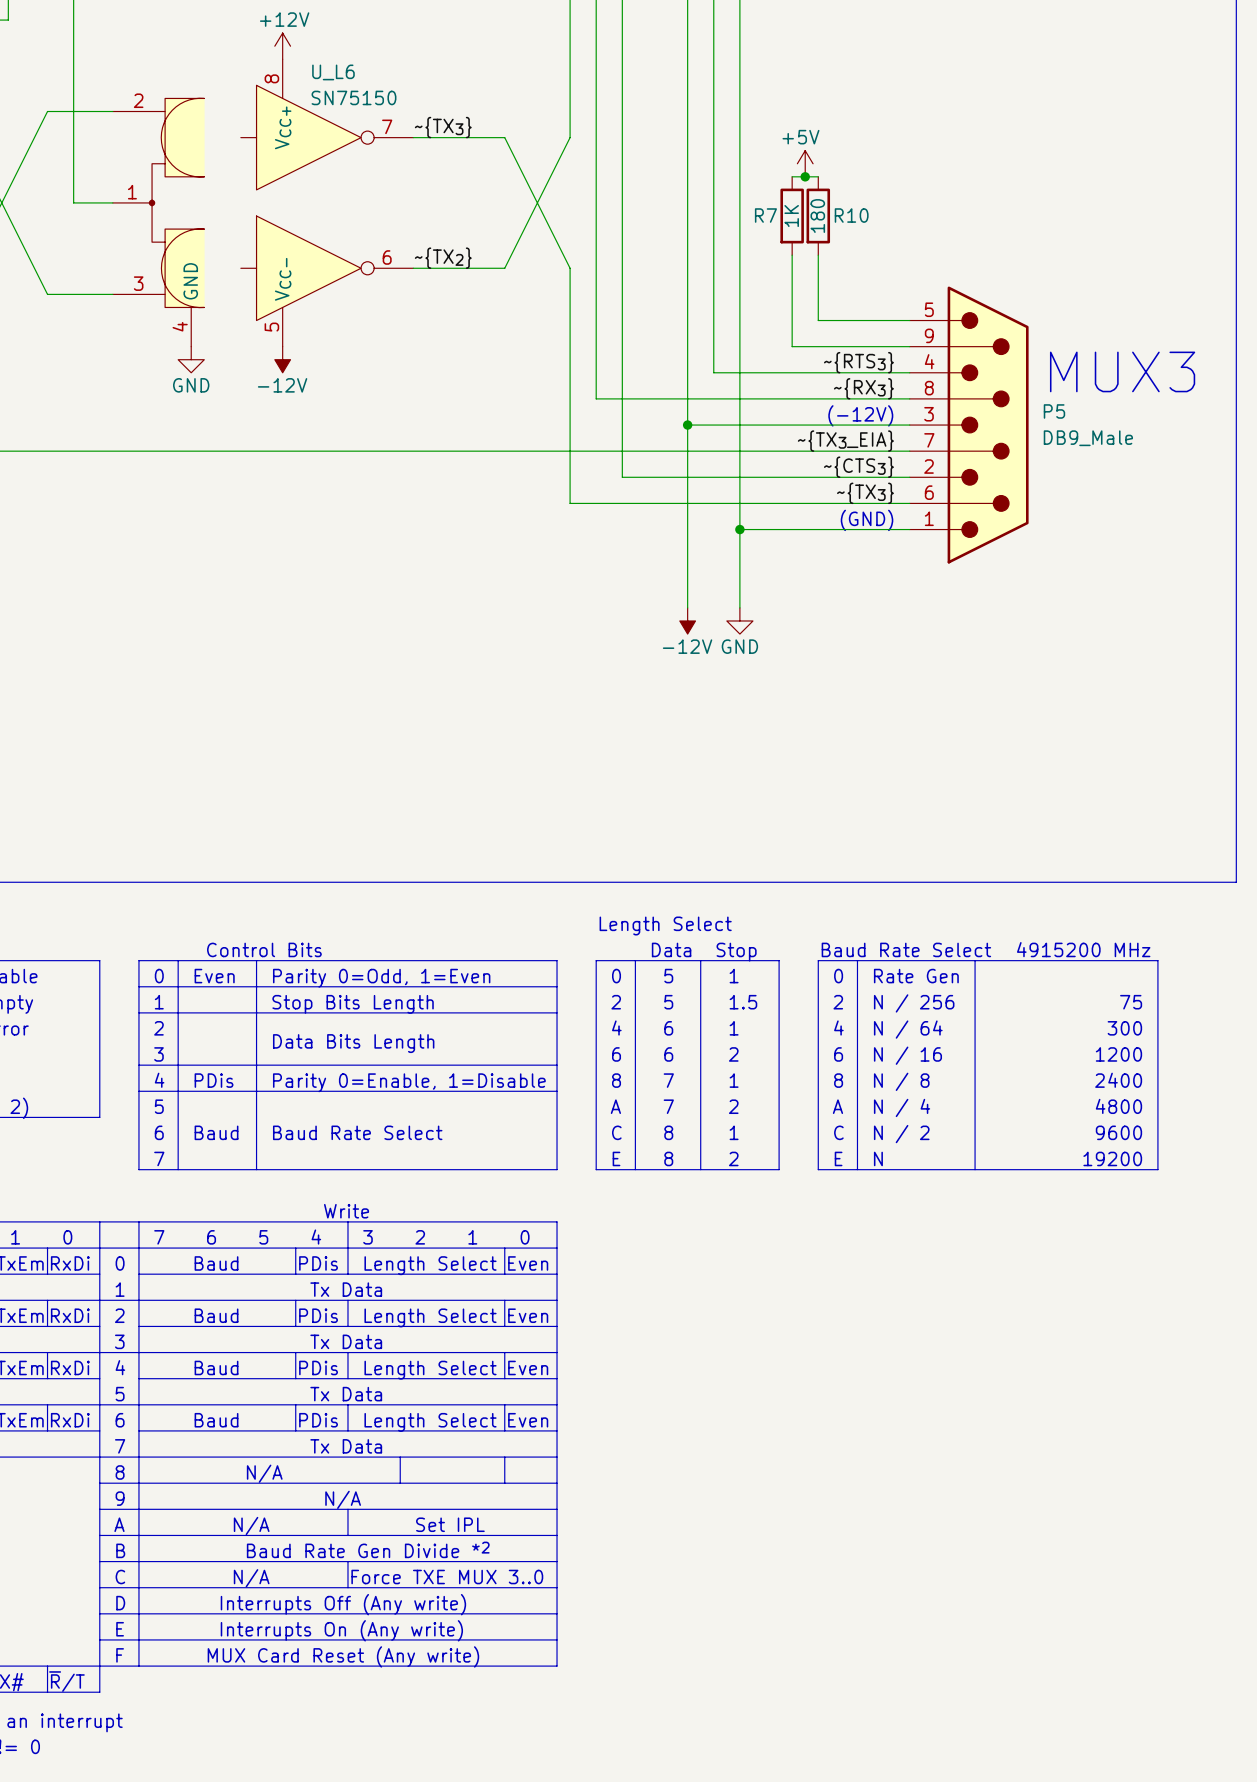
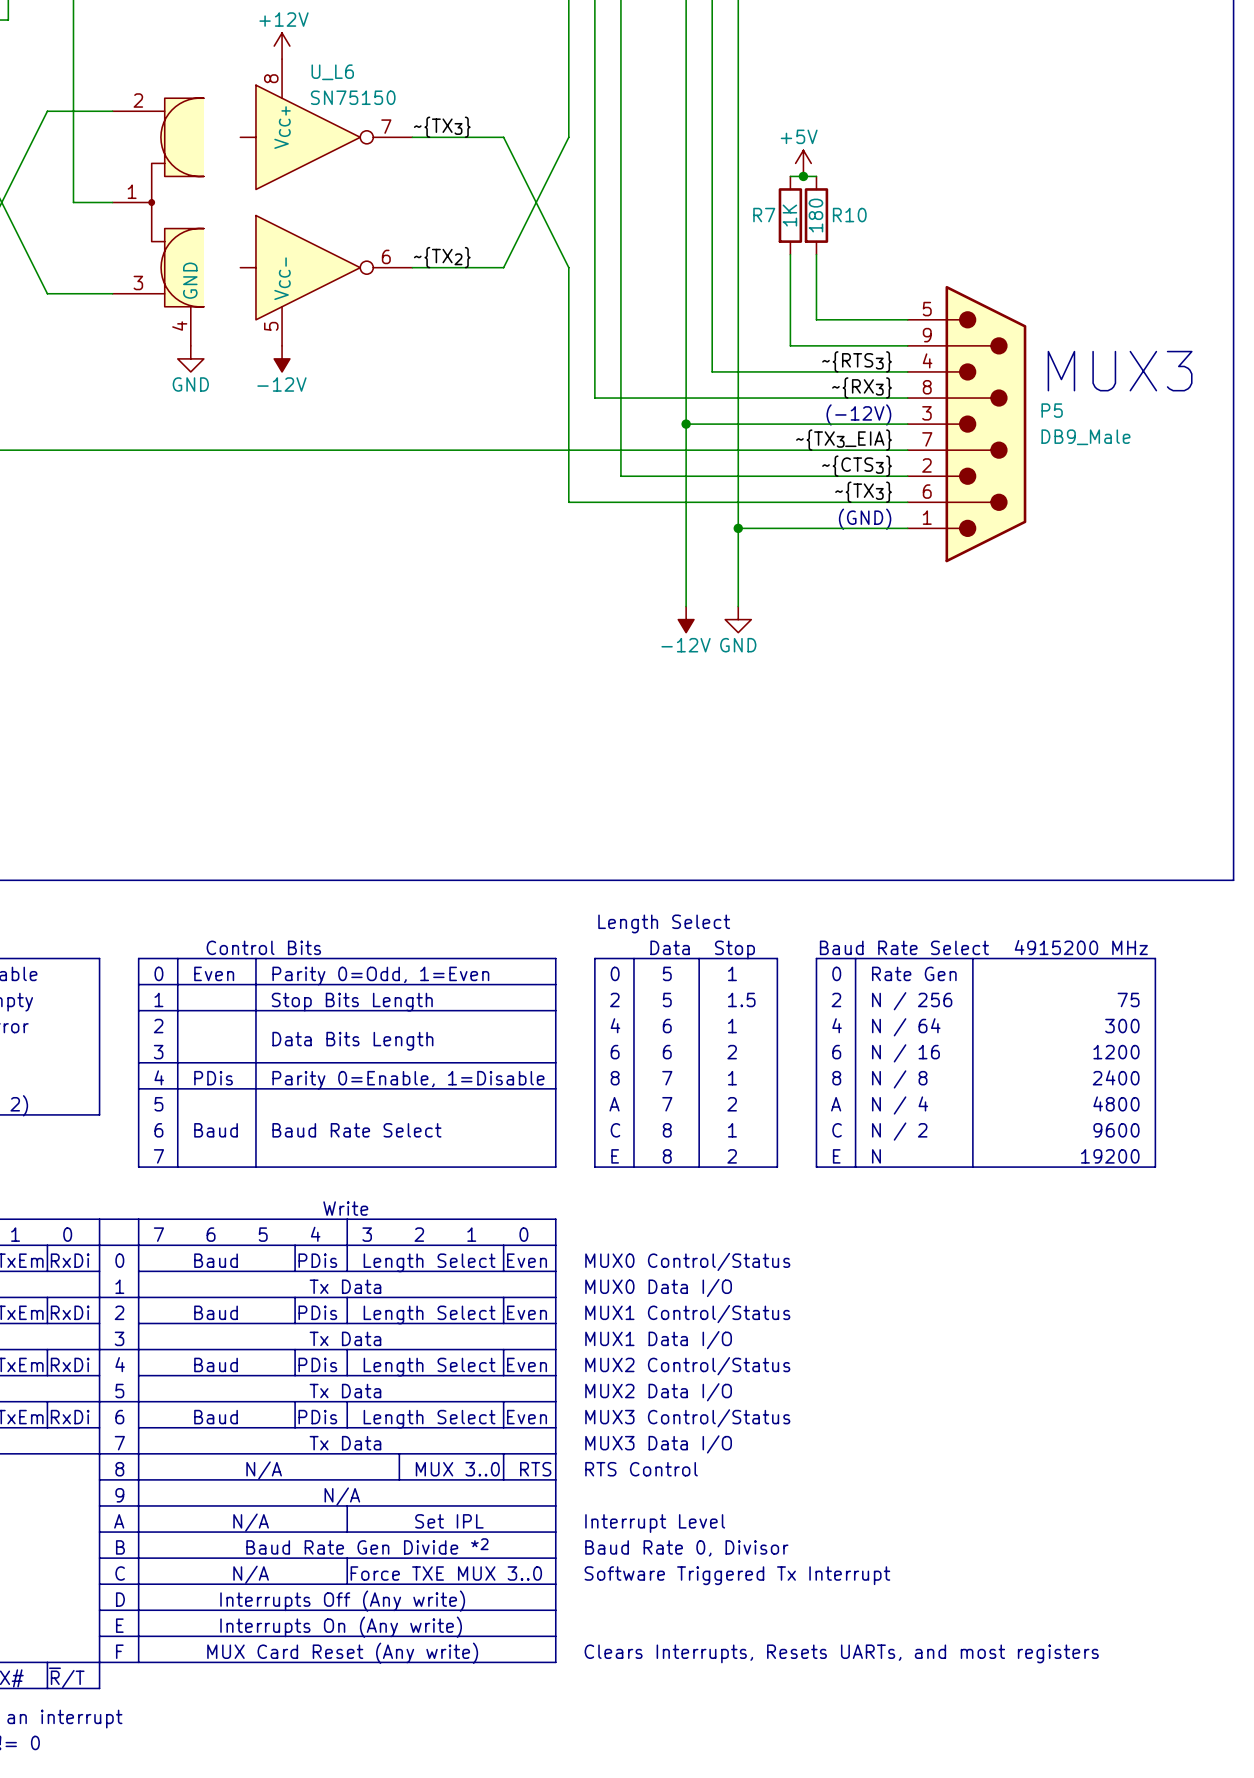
text: none -> MUX0 Control/Status (687, 1261)
text: none -> MUX0 Data I/O (658, 1287)
text: none -> MUX1 Control/Status (687, 1314)
text: none -> MUX1 Data I/O (658, 1340)
text: none -> MUX2 Control/Status (687, 1366)
text: none -> MUX2 Data I/O (658, 1392)
text: none -> MUX3 Control/Status (687, 1418)
text: none -> MUX3 Data I/O (658, 1444)
text: none -> MUX 3..0 (457, 1469)
text: none -> RTS (535, 1469)
text: none -> RTS Control (641, 1469)
text: none -> Interrupt Level (655, 1523)
text: none -> Baud Rate 0, Divisor (686, 1548)
text: none -> Software Triggered Tx Interrupt (737, 1575)
text: none -> Clears Interrupts, Resets UARTs, and most registers (841, 1653)

